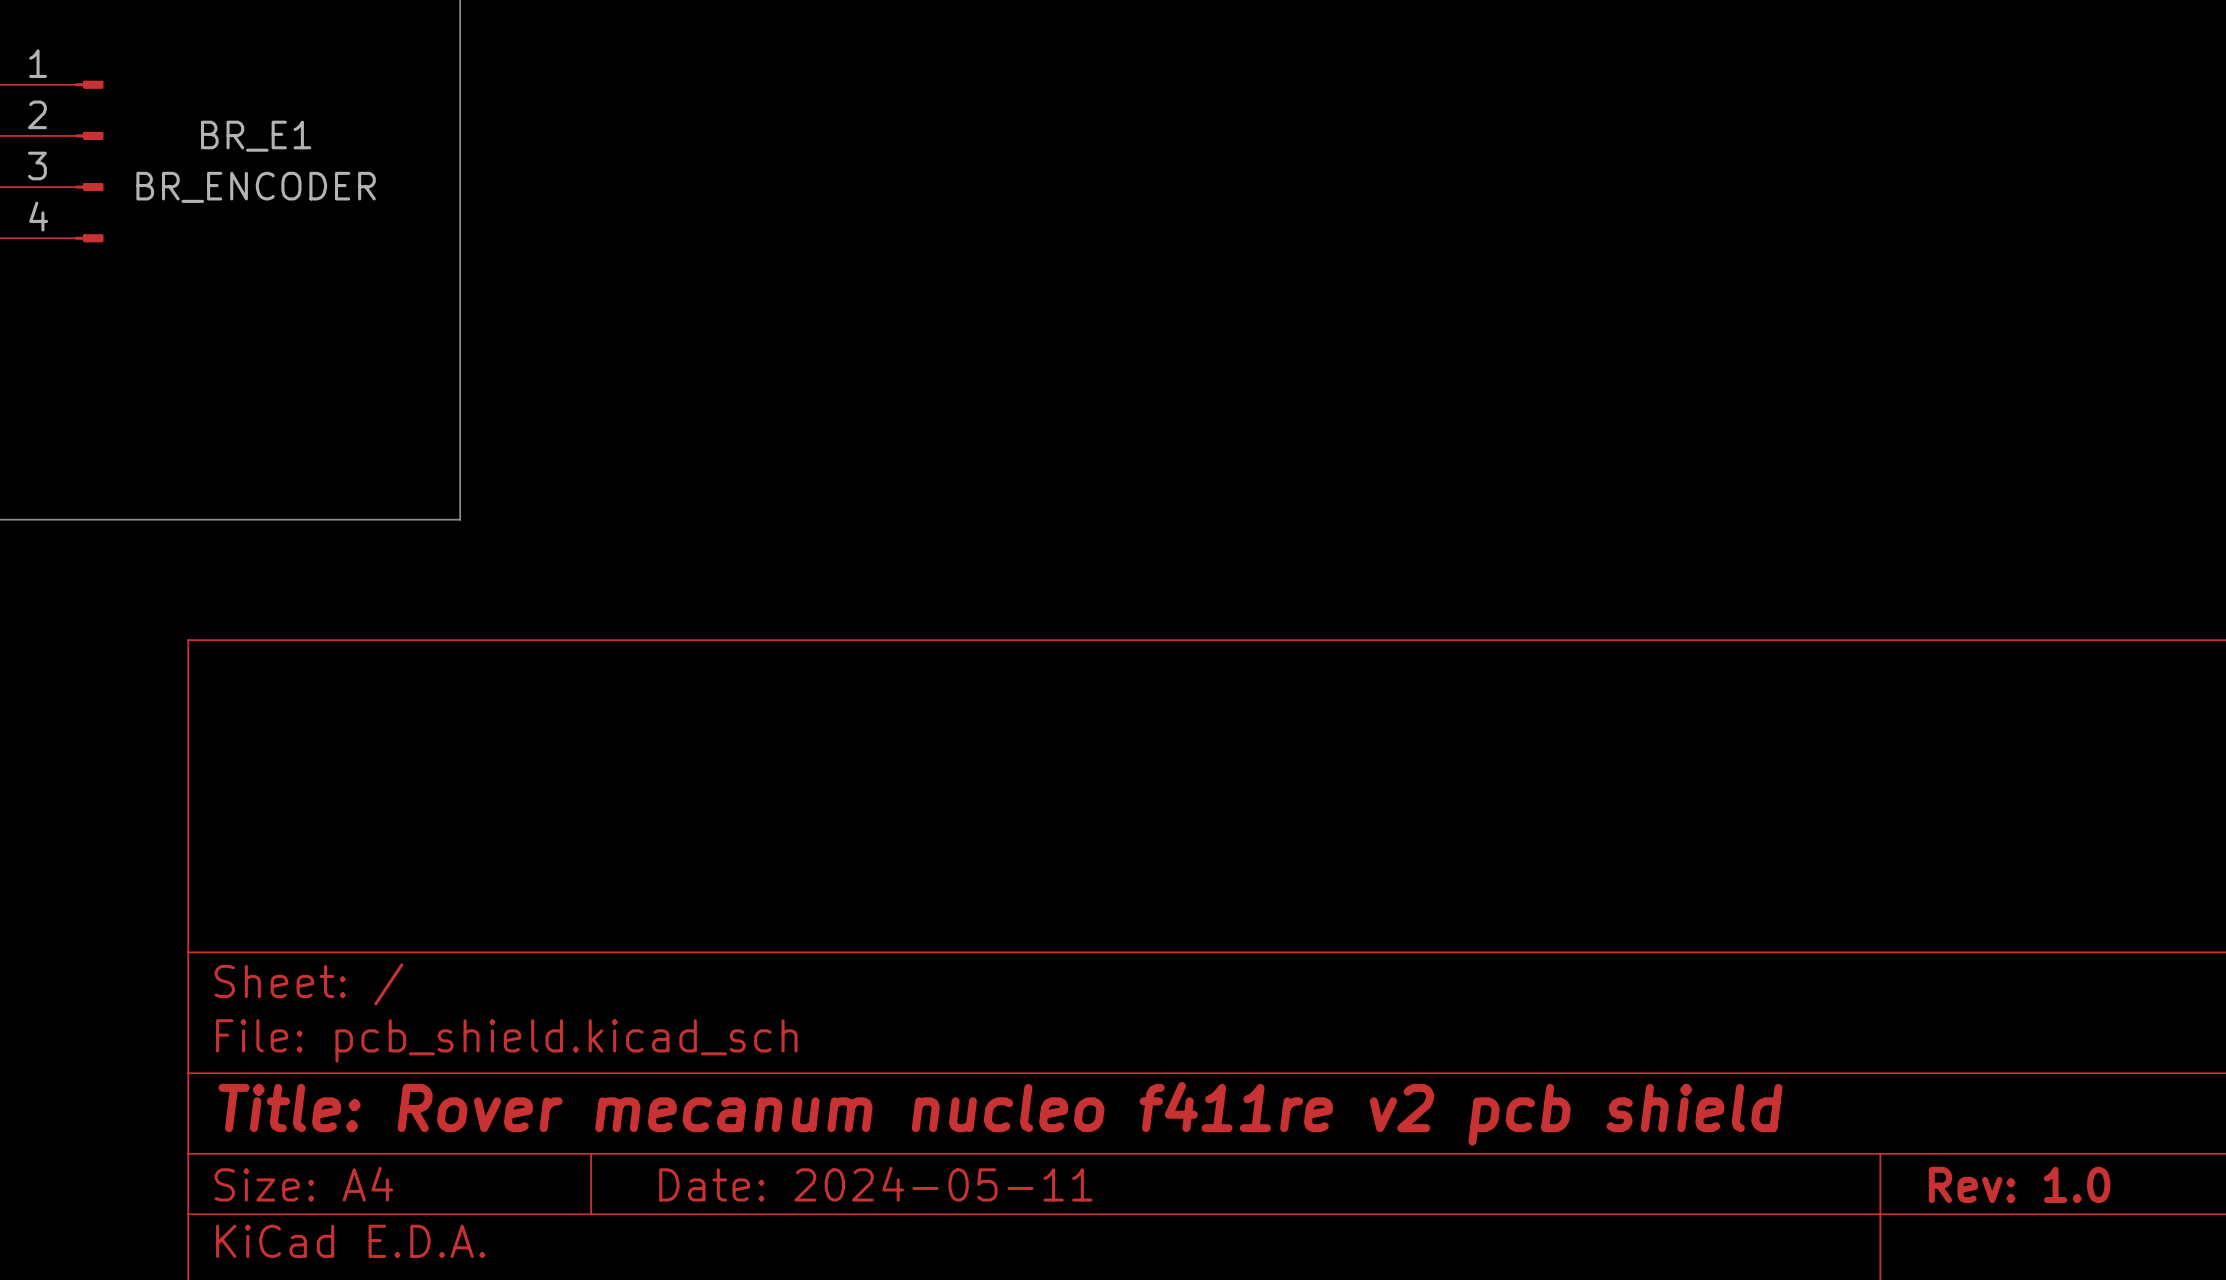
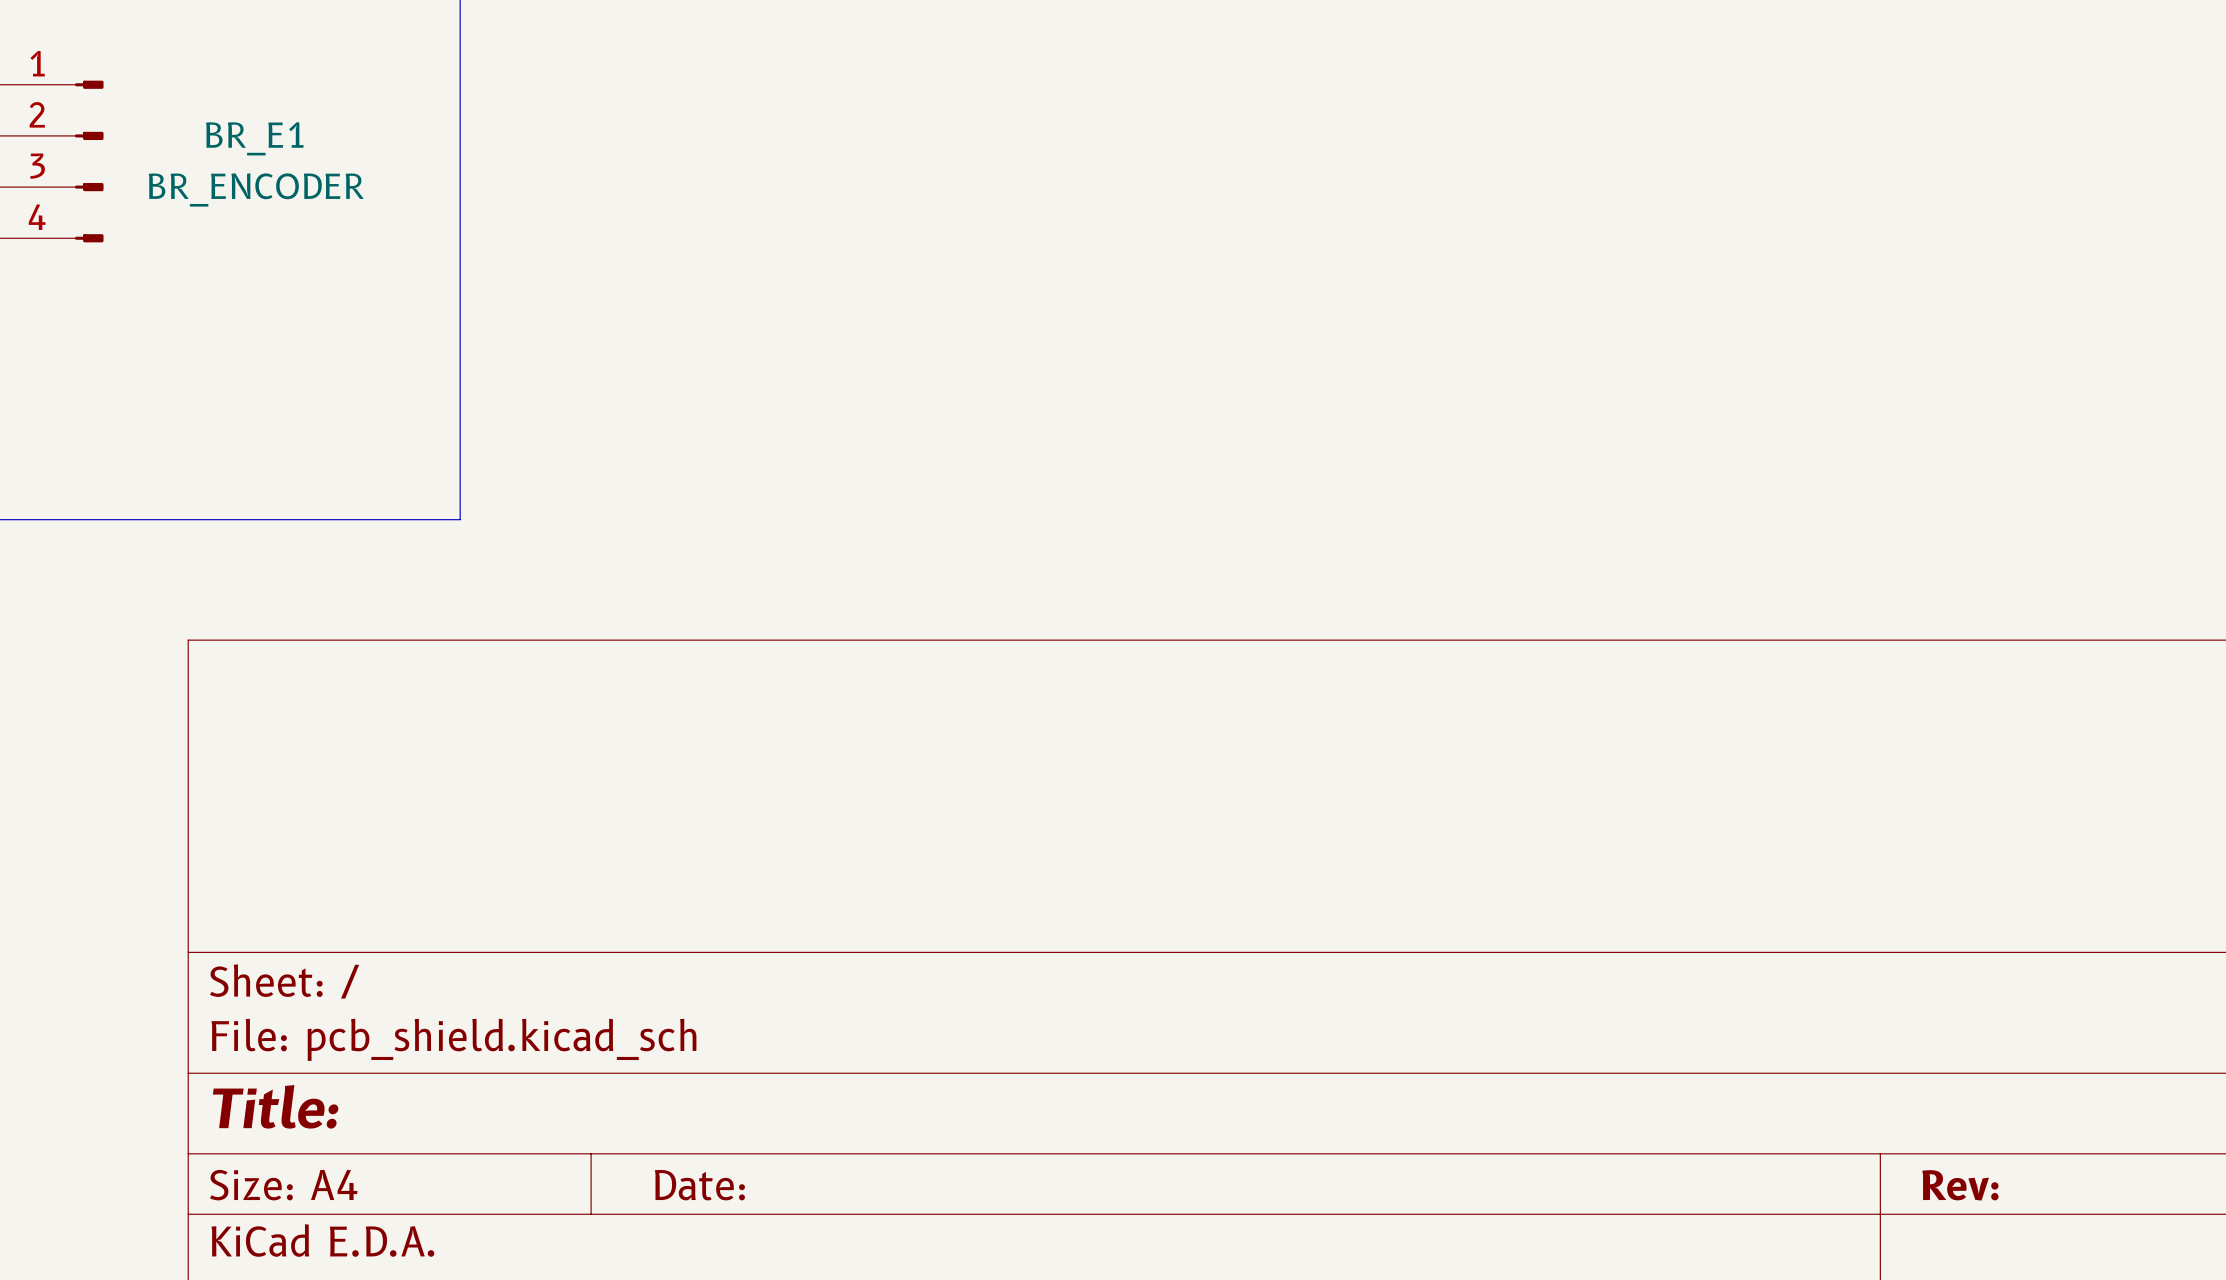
title block: Title: Rover mecanum nucleo f411re v2 pcb shield (1000, 1113) -> Title: (275, 1106)
title block: Date: 2024-05-11 (875, 1184) -> Date: (699, 1185)
title block: Rev: 1.0 (2019, 1184) -> Rev: (1960, 1185)

